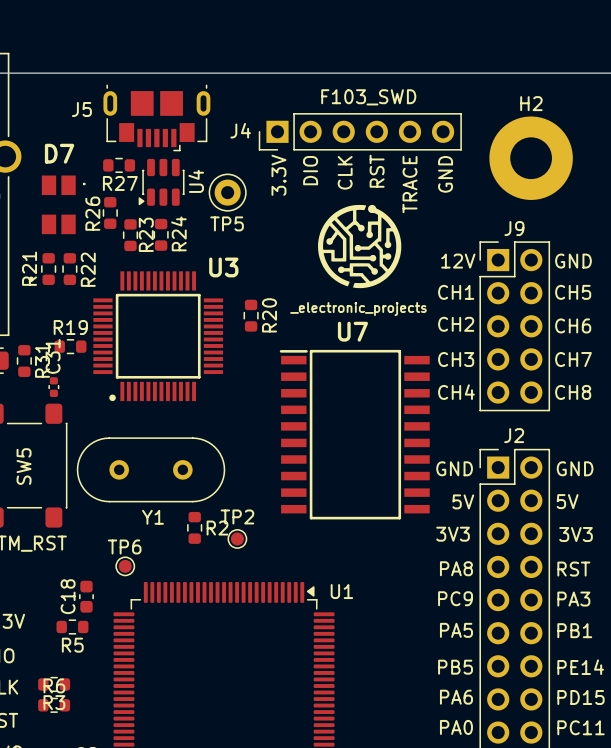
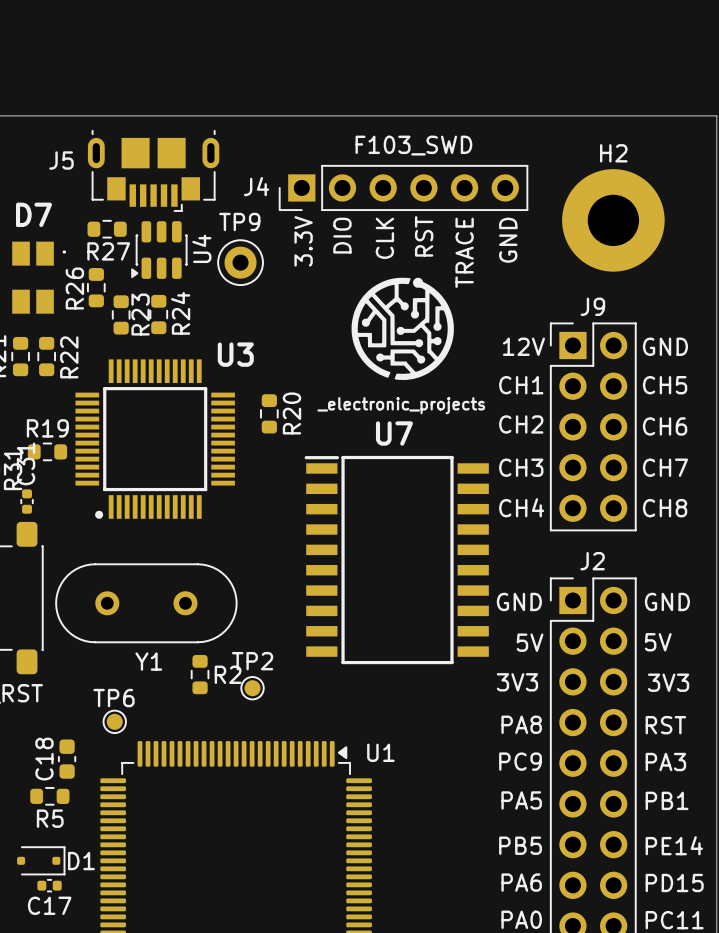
TP5 name: TP5 (227, 223) -> TP9 (239, 221)
D1: none -> (41, 860)
R3: (54, 684) -> none
C17: none -> (49, 885)
R6: (54, 705) -> none

